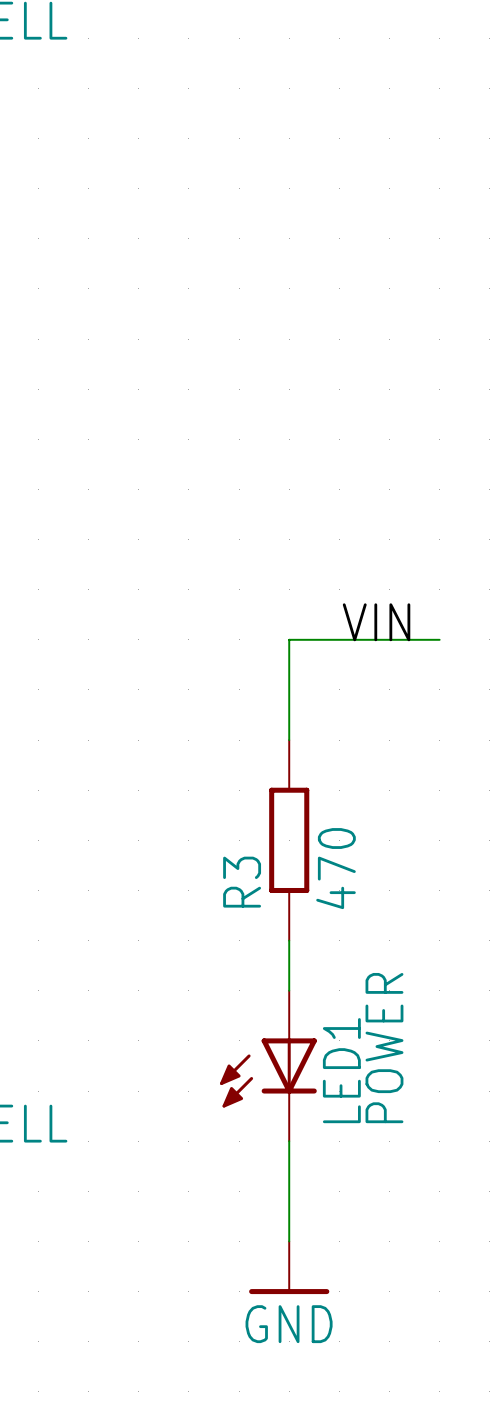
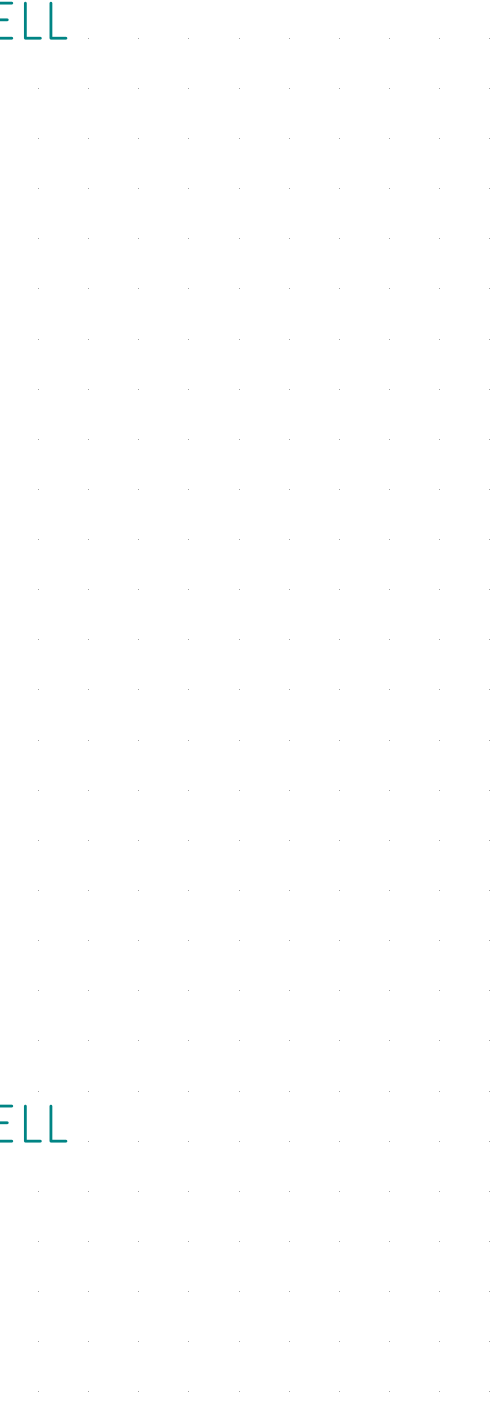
label: VIN (376, 622) -> none
wire: (439, 639) (289, 639) (289, 740) -> none
R3: 470 (289, 840) -> none
wire: (289, 940) (289, 990) -> none
LED1: POWER (268, 1065) -> none
wire: (289, 1141) (289, 1241) -> none
power symbol: GND (289, 1267) -> none

